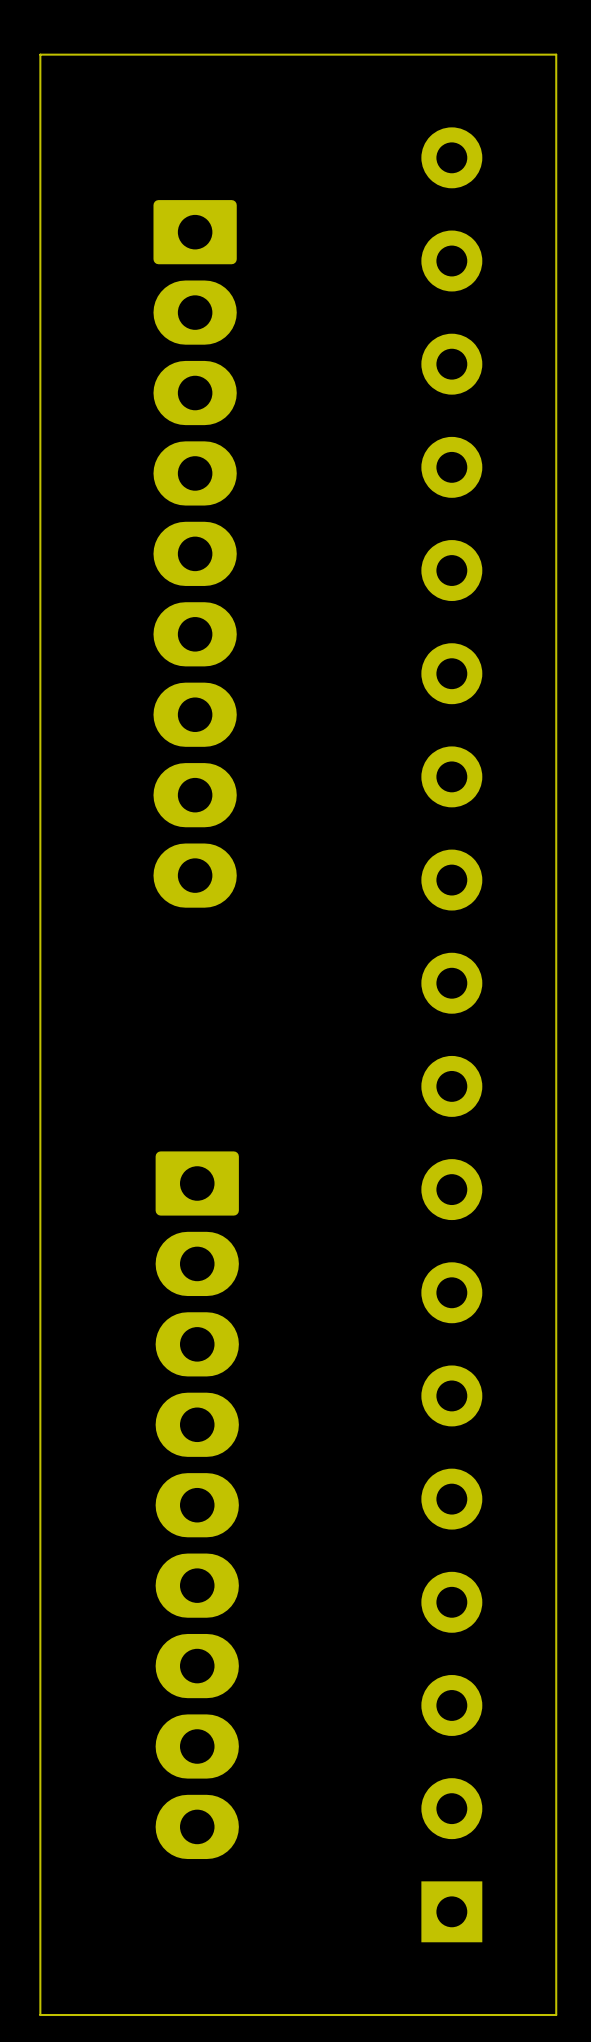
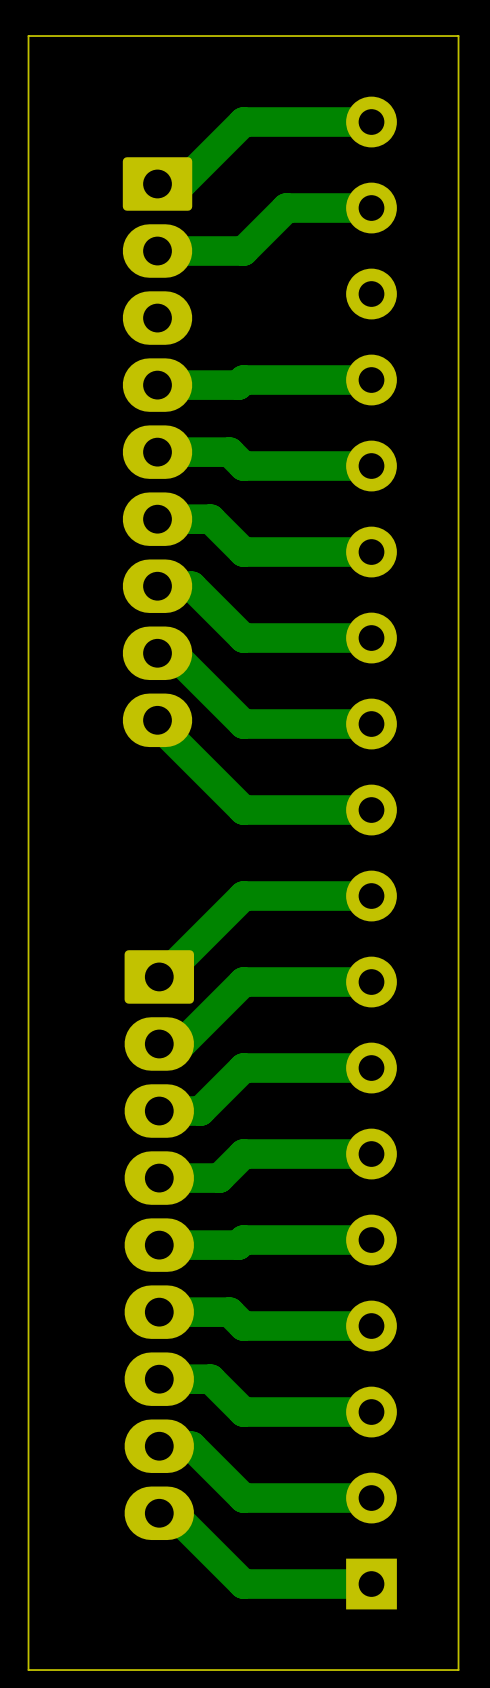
track: none -> (371, 122) (243, 122) (181, 183) (157, 183)
track: none -> (371, 208) (286, 208) (243, 251) (157, 251)
track: none -> (371, 380) (243, 380) (238, 385) (157, 385)
track: none -> (157, 452) (229, 452) (243, 466) (371, 466)
track: none -> (157, 519) (210, 519) (243, 552) (371, 552)
track: none -> (157, 586) (191, 586) (243, 638) (371, 638)
track: none -> (157, 653) (172, 653) (243, 724) (371, 724)
track: none -> (157, 720) (157, 724) (243, 810) (371, 810)
track: none -> (371, 896) (243, 896) (162, 976) (159, 976)
track: none -> (371, 982) (243, 982) (181, 1043) (159, 1043)
track: none -> (371, 1068) (243, 1068) (200, 1111) (159, 1111)
track: none -> (371, 1154) (243, 1154) (219, 1178) (159, 1178)
track: none -> (371, 1240) (243, 1240) (238, 1245) (159, 1245)
track: none -> (159, 1312) (229, 1312) (243, 1326) (371, 1326)
track: none -> (159, 1379) (210, 1379) (243, 1412) (371, 1412)
track: none -> (159, 1446) (191, 1446) (243, 1498) (371, 1498)
track: none -> (159, 1513) (172, 1513) (243, 1584) (371, 1584)

